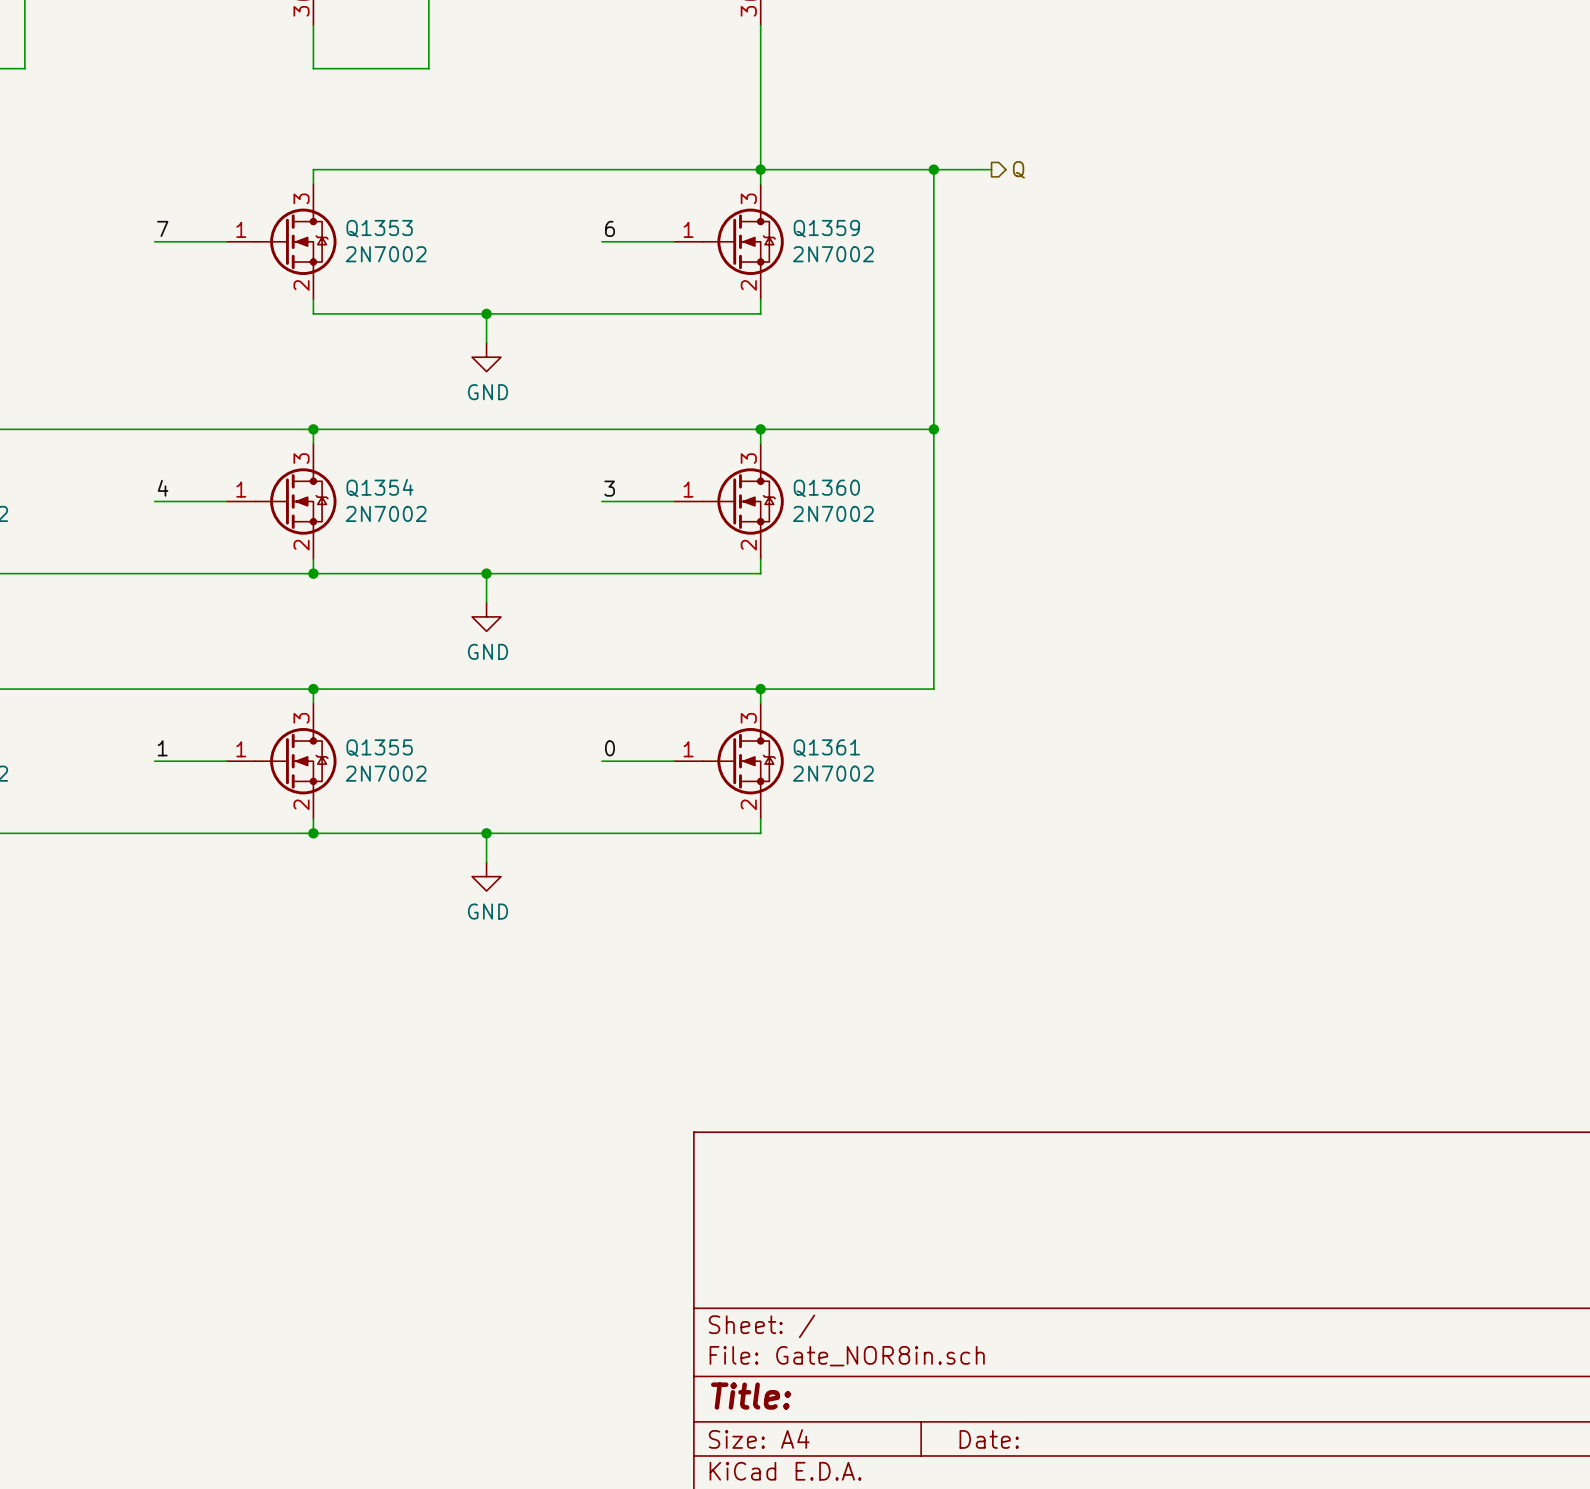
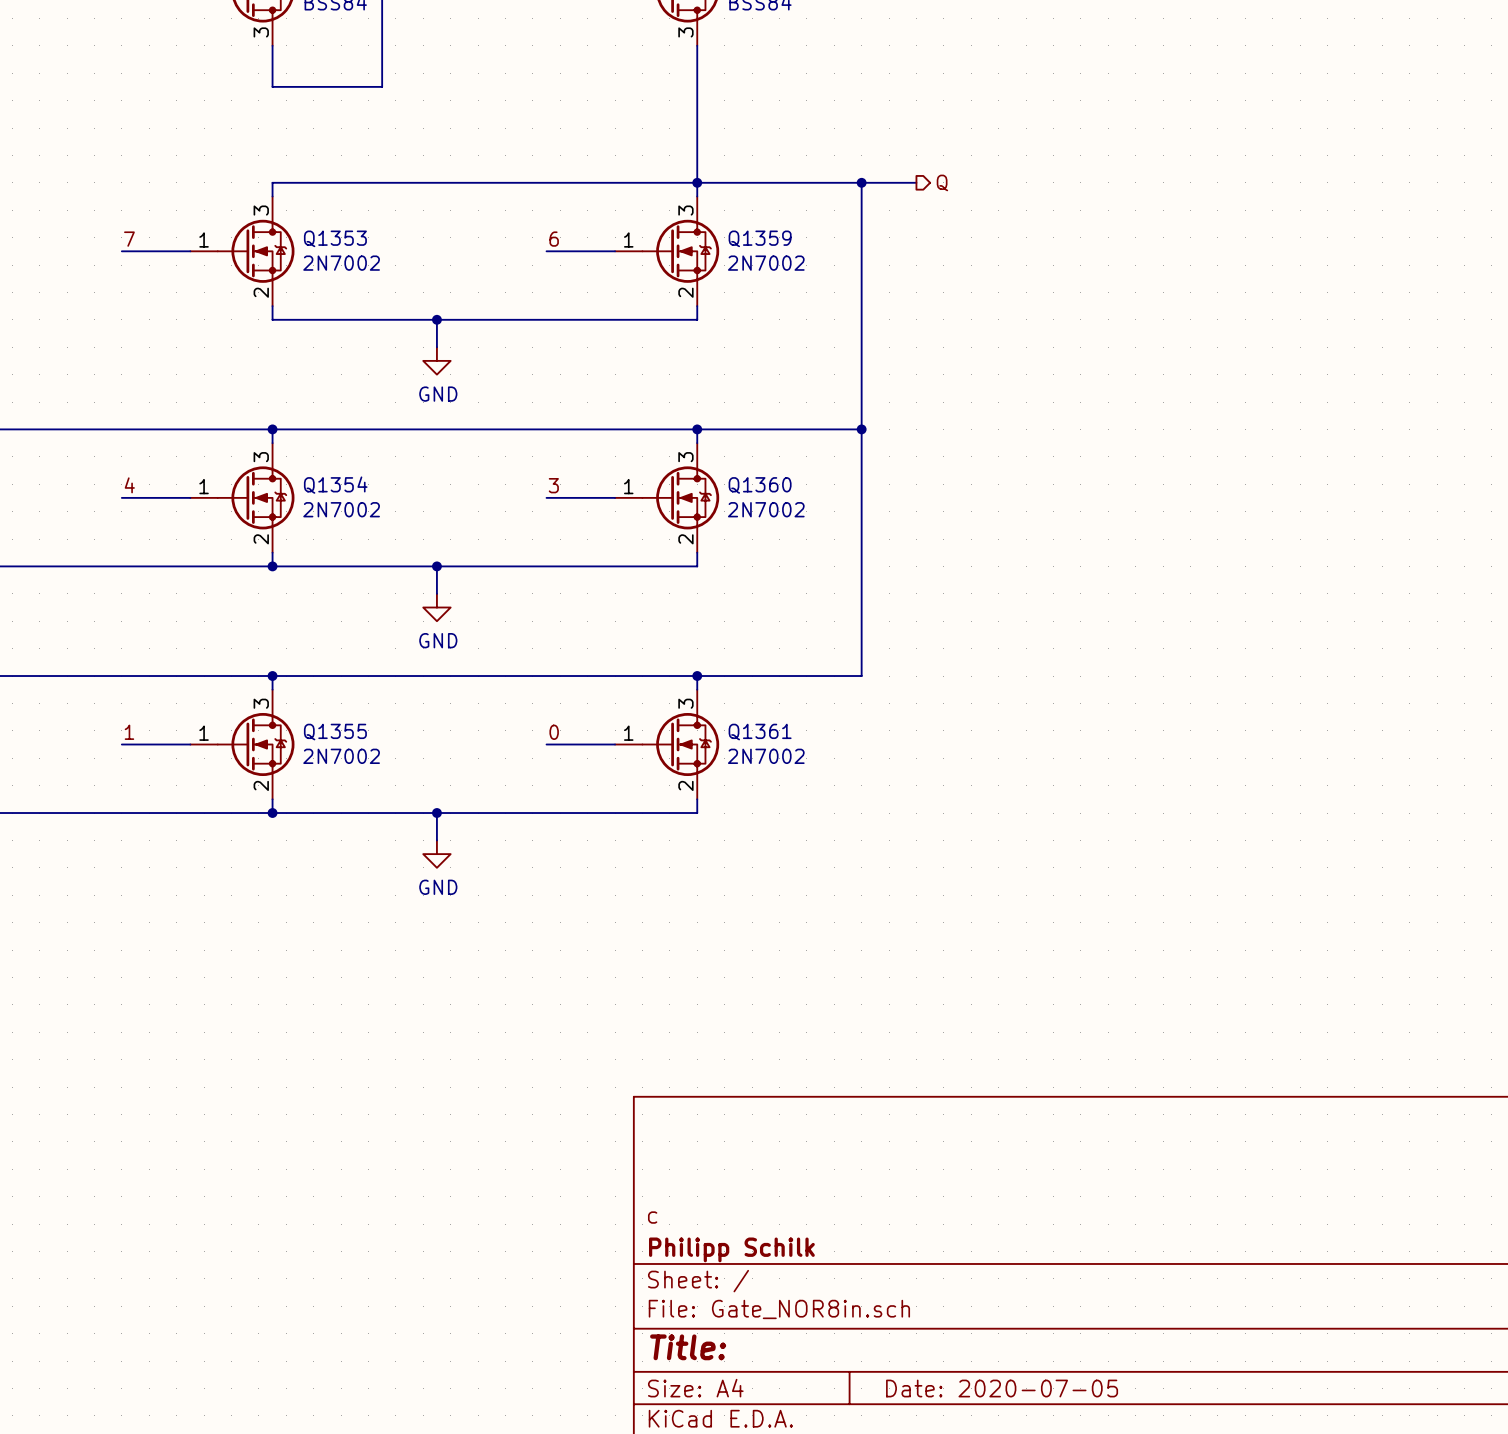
title block: none -> c (652, 1217)
title block: none -> Philipp Schilk (731, 1249)
title block: Date: (989, 1439) -> Date: 2020-07-05 (1002, 1388)

